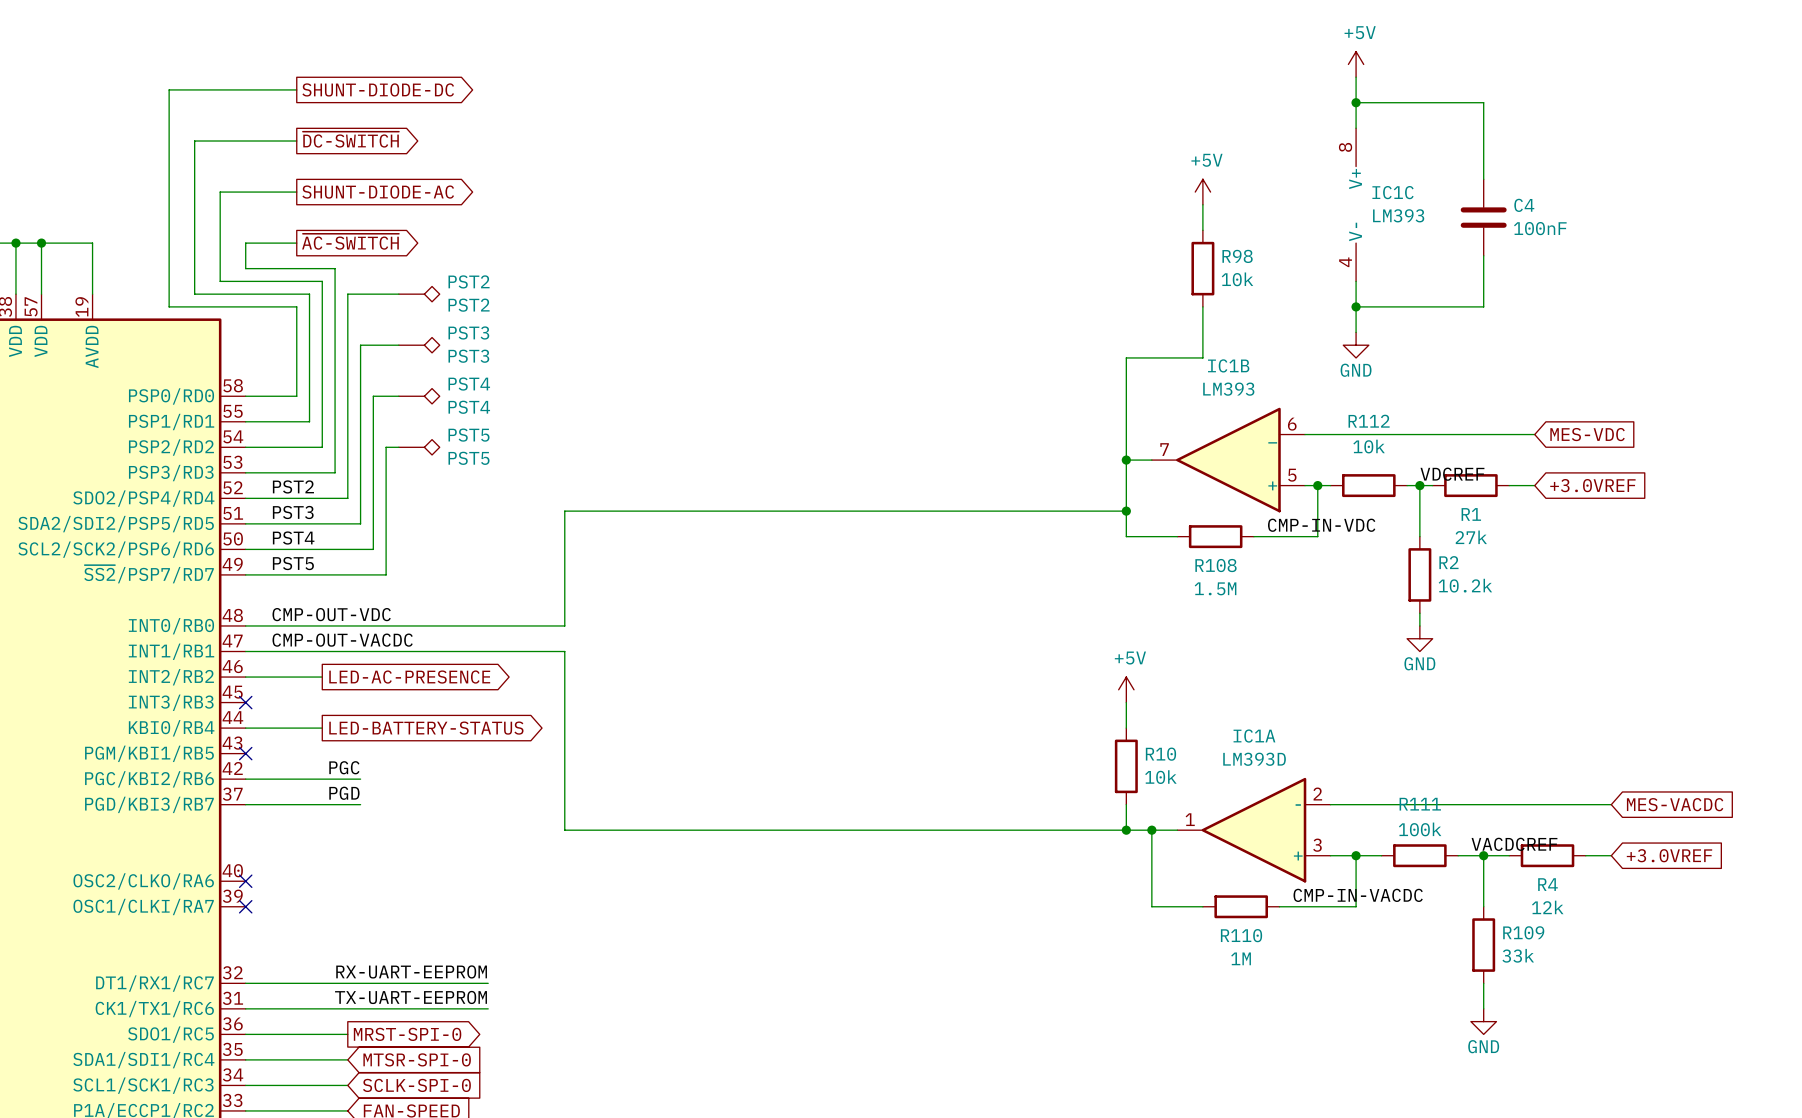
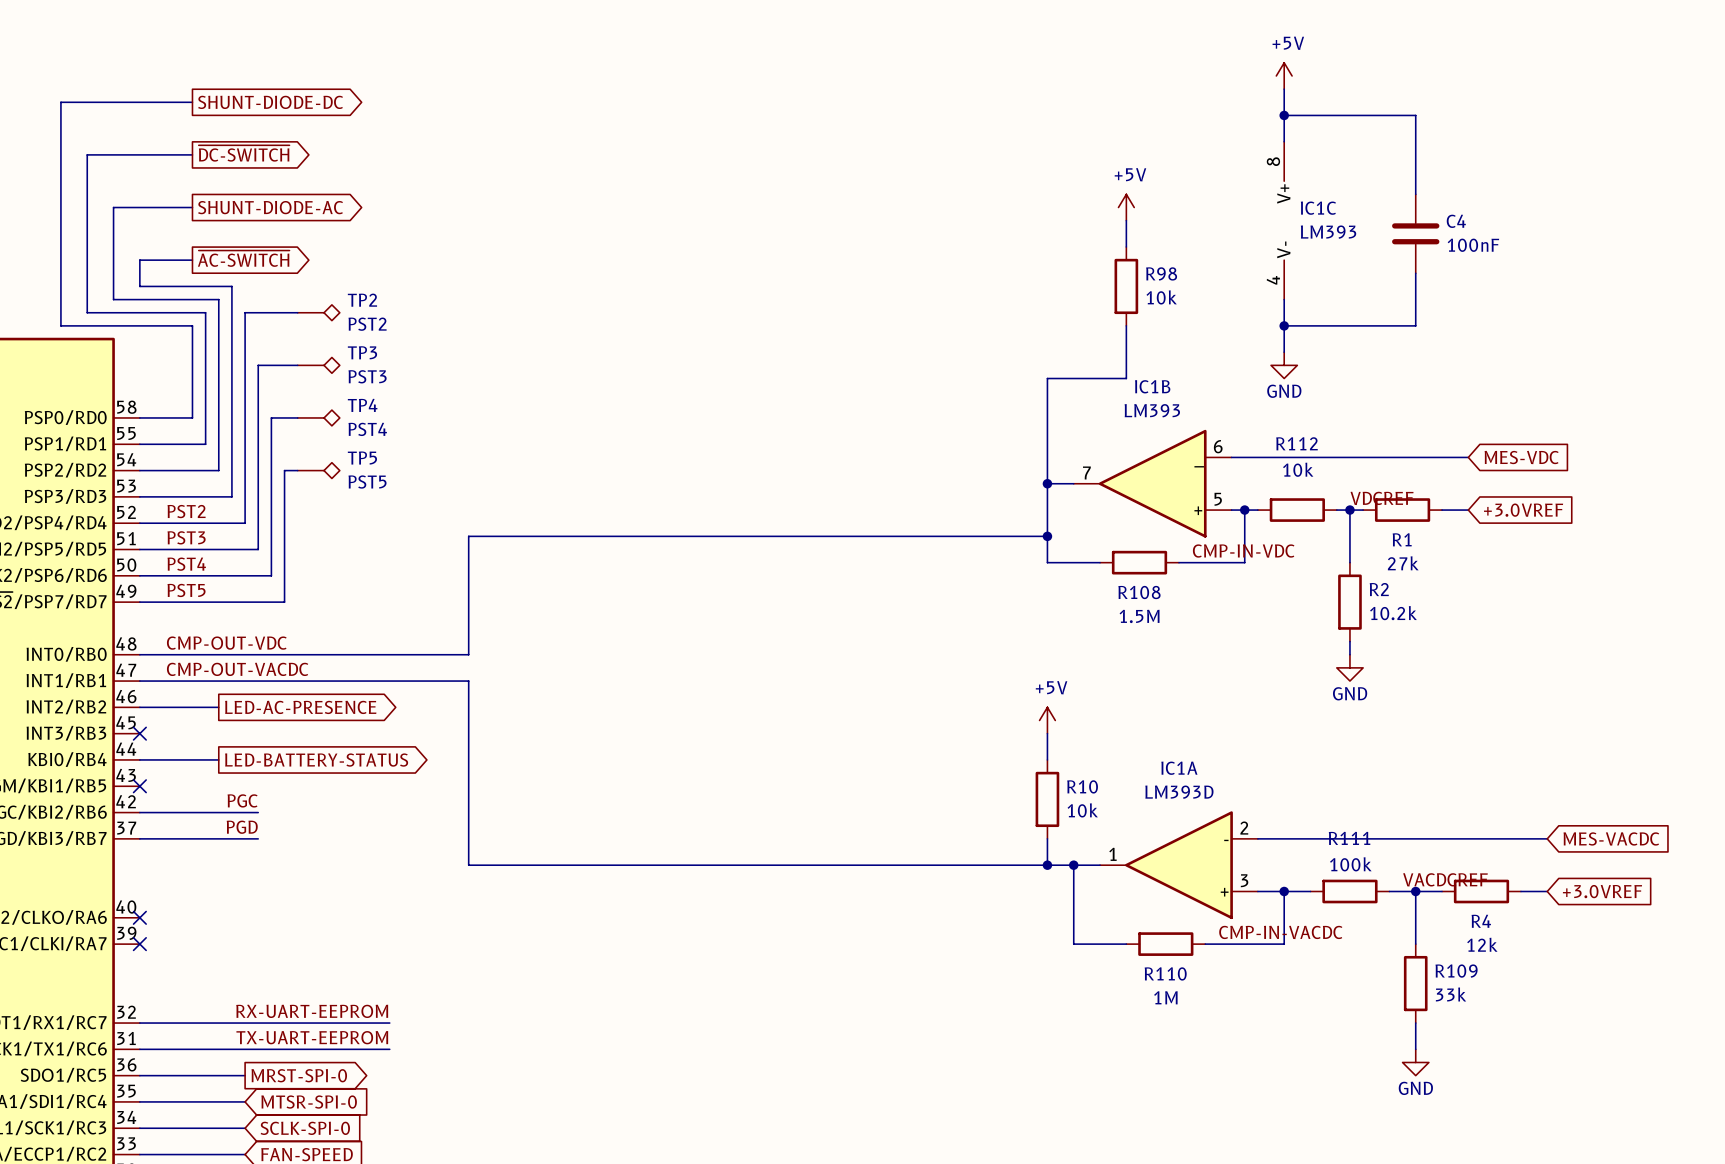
PST2 name: PST2 (469, 281) -> TP2 (362, 300)
PST3 name: PST3 (468, 332) -> TP3 (362, 352)
PST4 name: PST4 (469, 384) -> TP4 (362, 405)
PST5 name: PST5 (469, 435) -> TP5 (362, 458)

